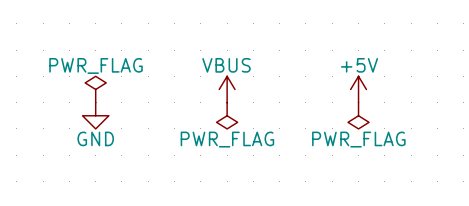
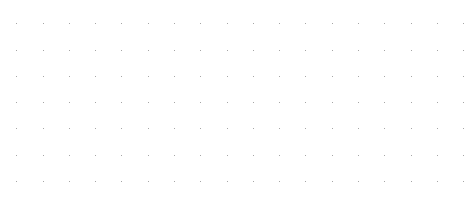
power symbol: PWR_FLAG (95, 89) -> none
power symbol: VBUS (227, 89) -> none
power symbol: +5V (358, 89) -> none
power symbol: GND (95, 115) -> none
power symbol: PWR_FLAG (227, 115) -> none
power symbol: PWR_FLAG (358, 115) -> none

